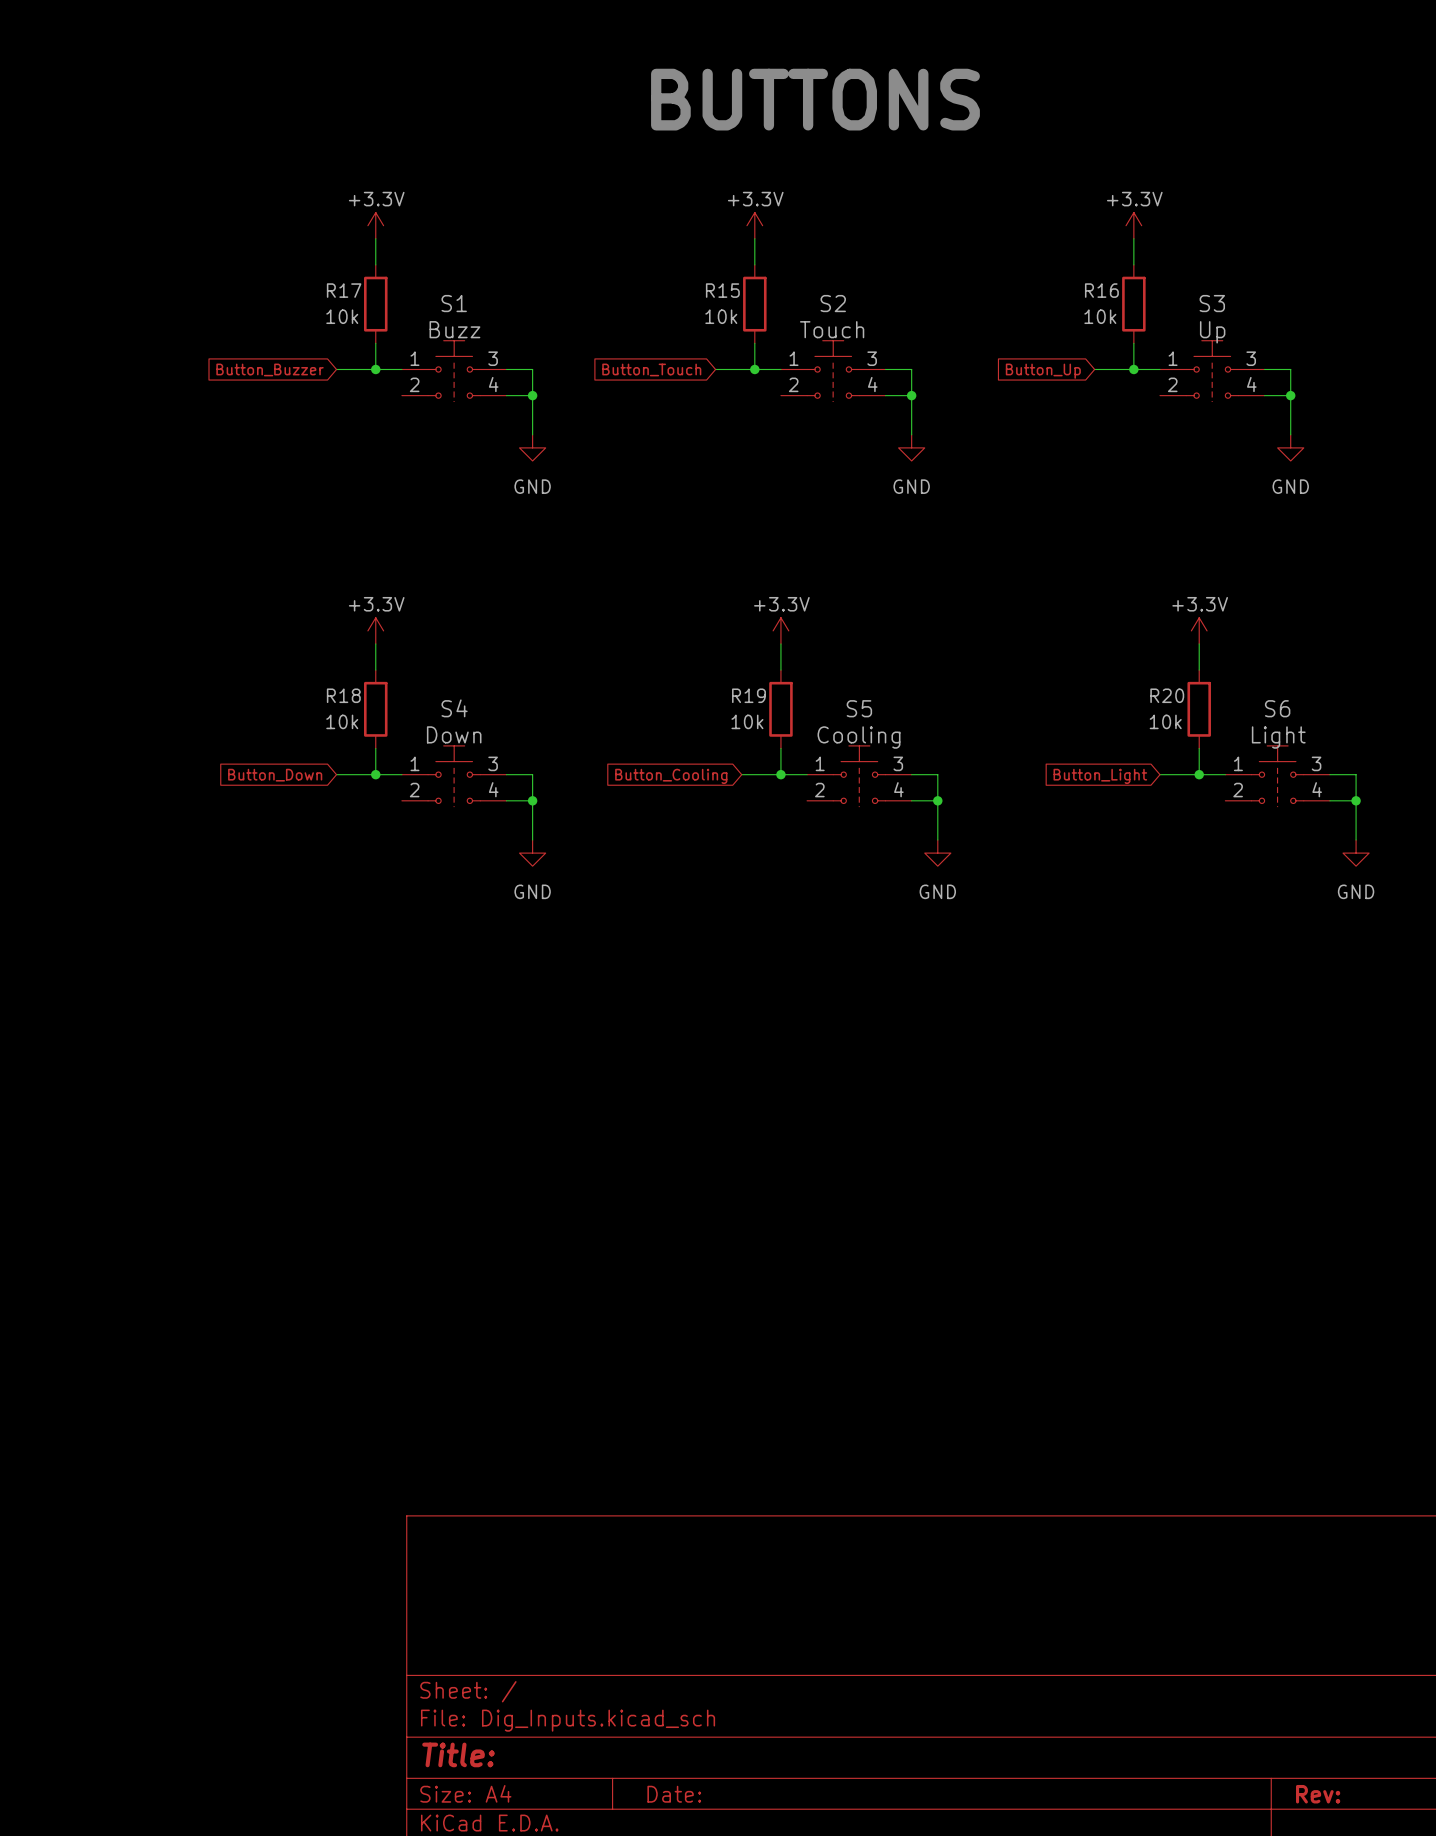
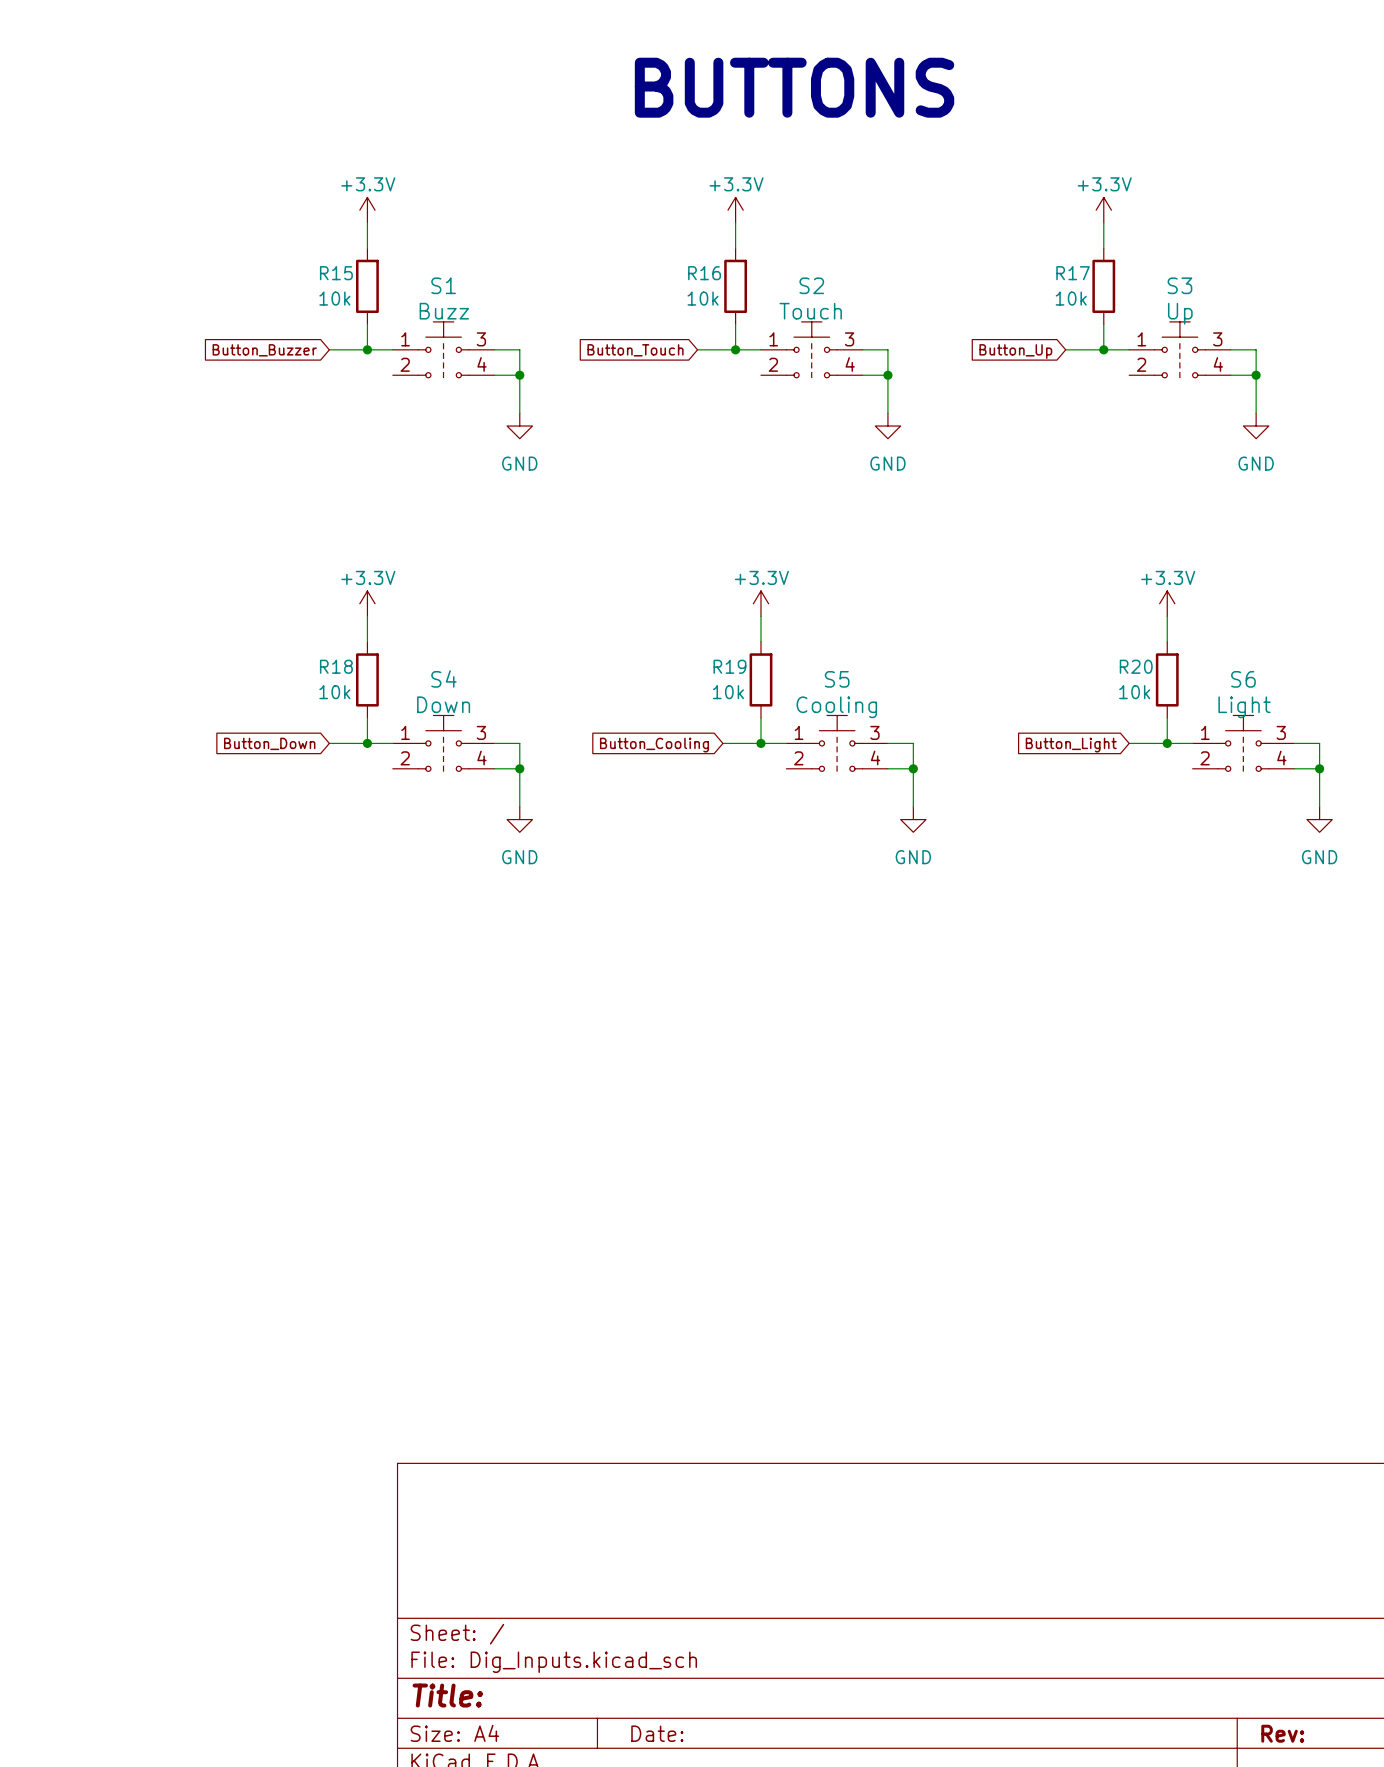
R17 name: R17 (344, 290) -> R15 (336, 273)
R15 name: R15 (722, 290) -> R16 (704, 273)
R16 name: R16 (1101, 290) -> R17 (1073, 273)

